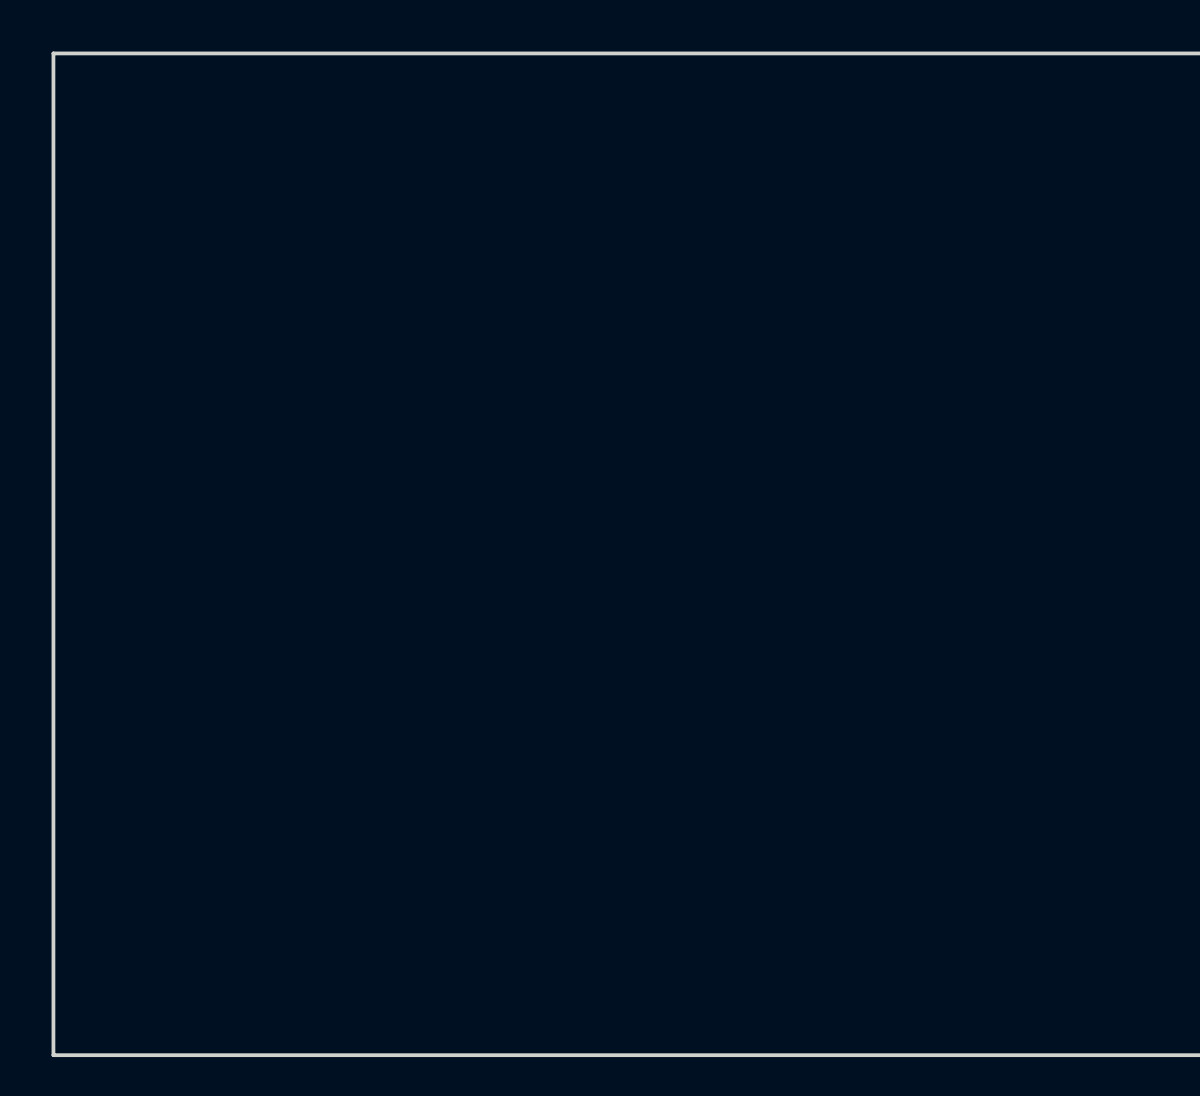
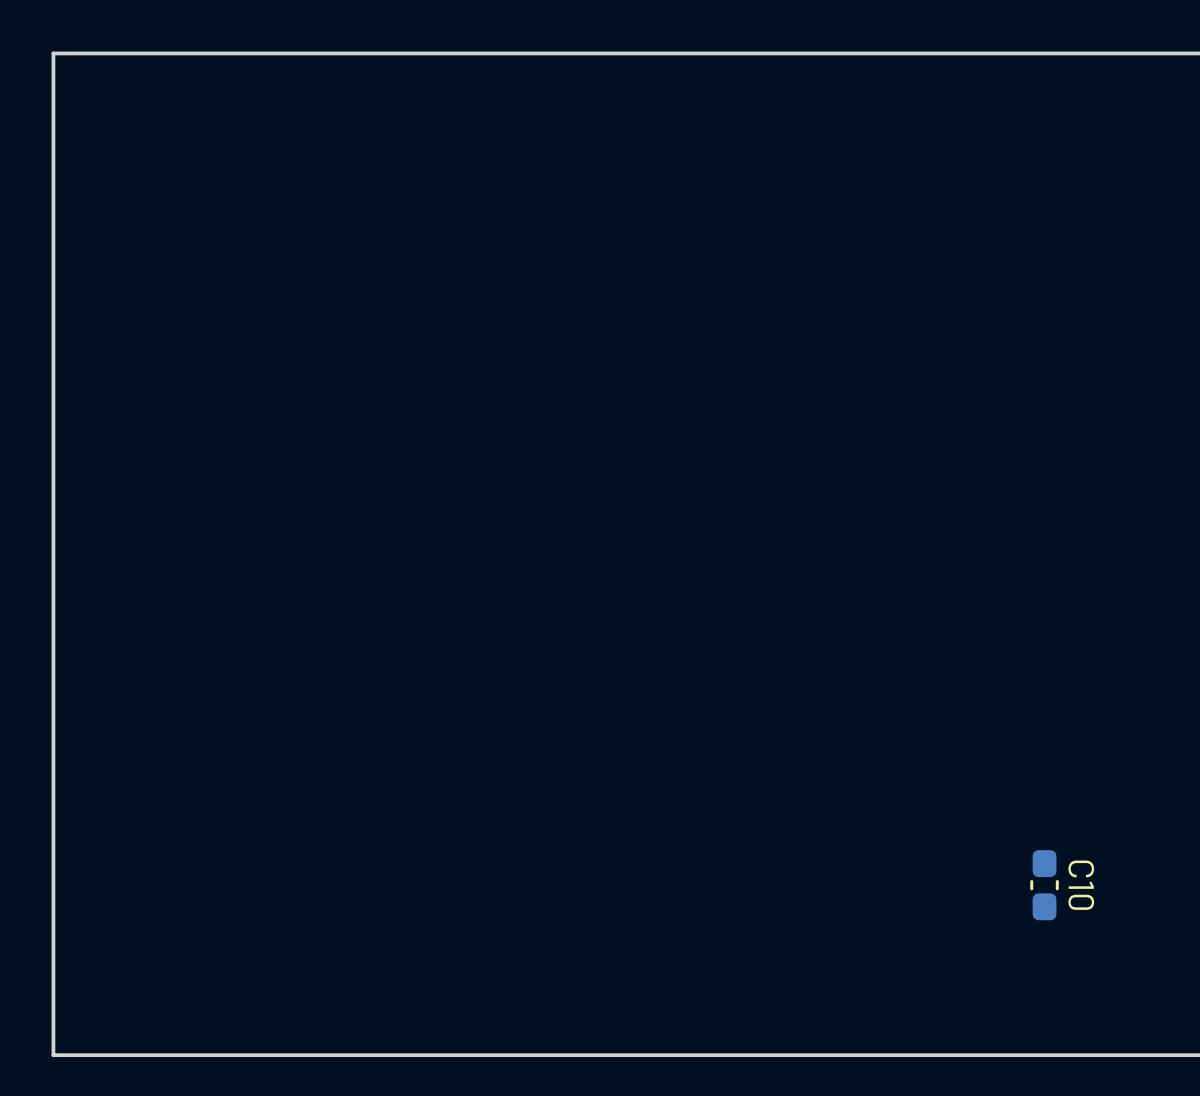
C10: none -> (1044, 885)

